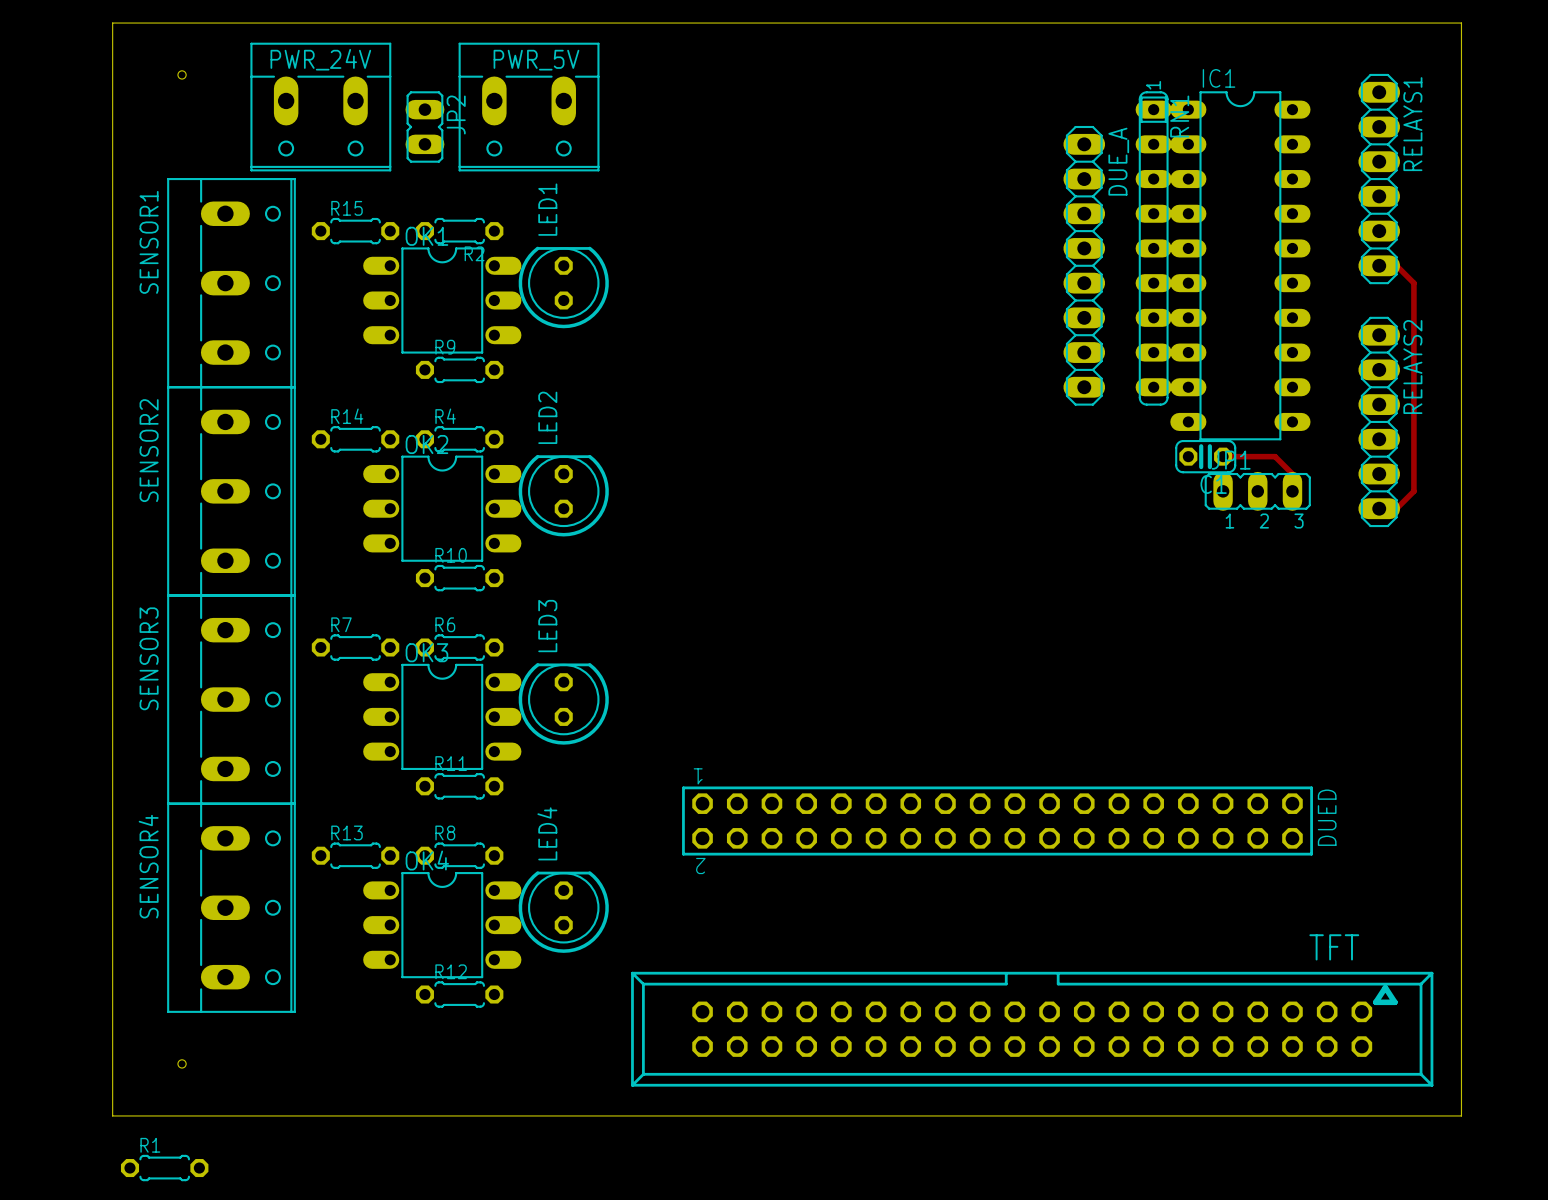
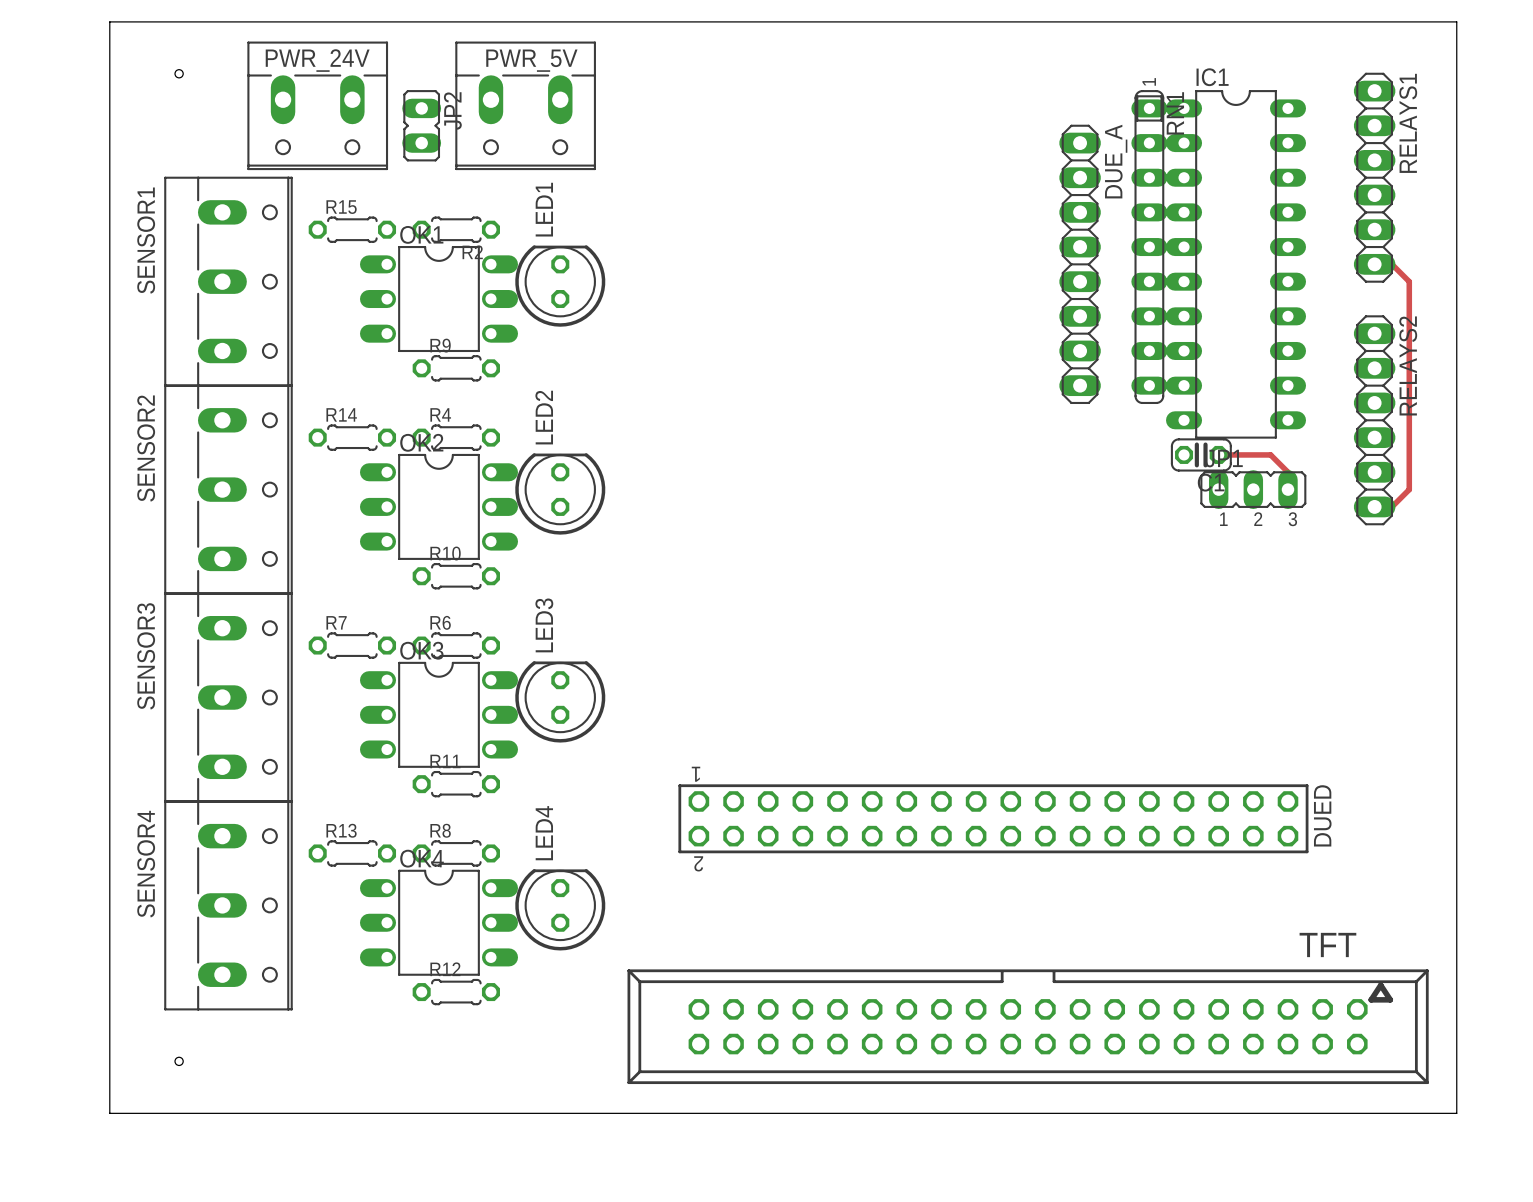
R1: (164, 1168) -> none

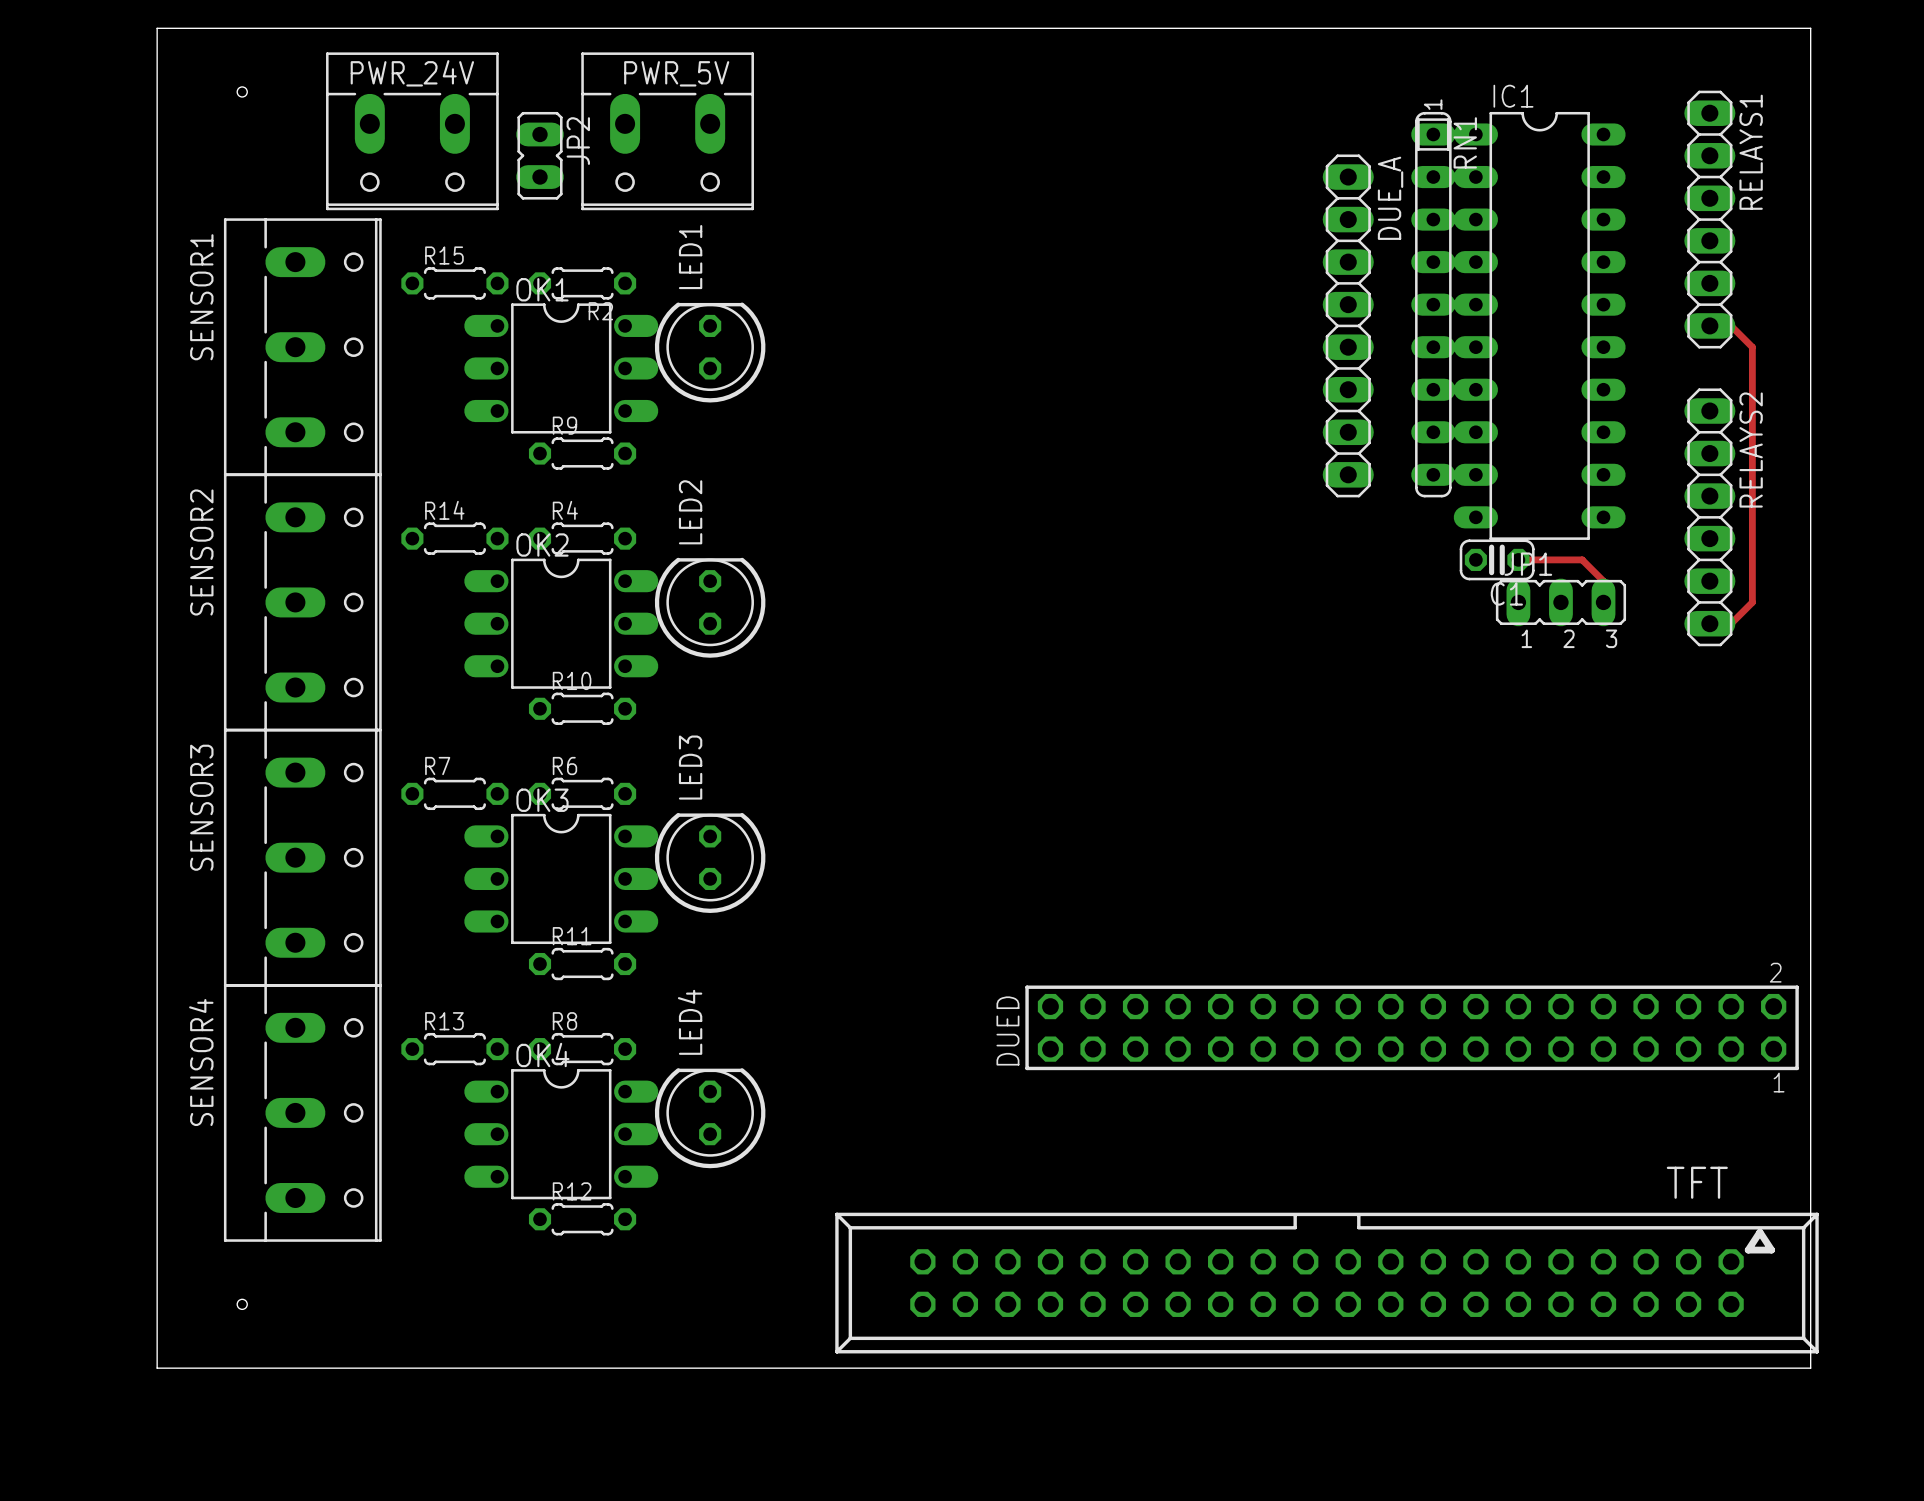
DUED rotation: 0° (993, 818) -> 180° (1412, 1027)
TFT position: (1028, 1026) -> (1326, 1283)

